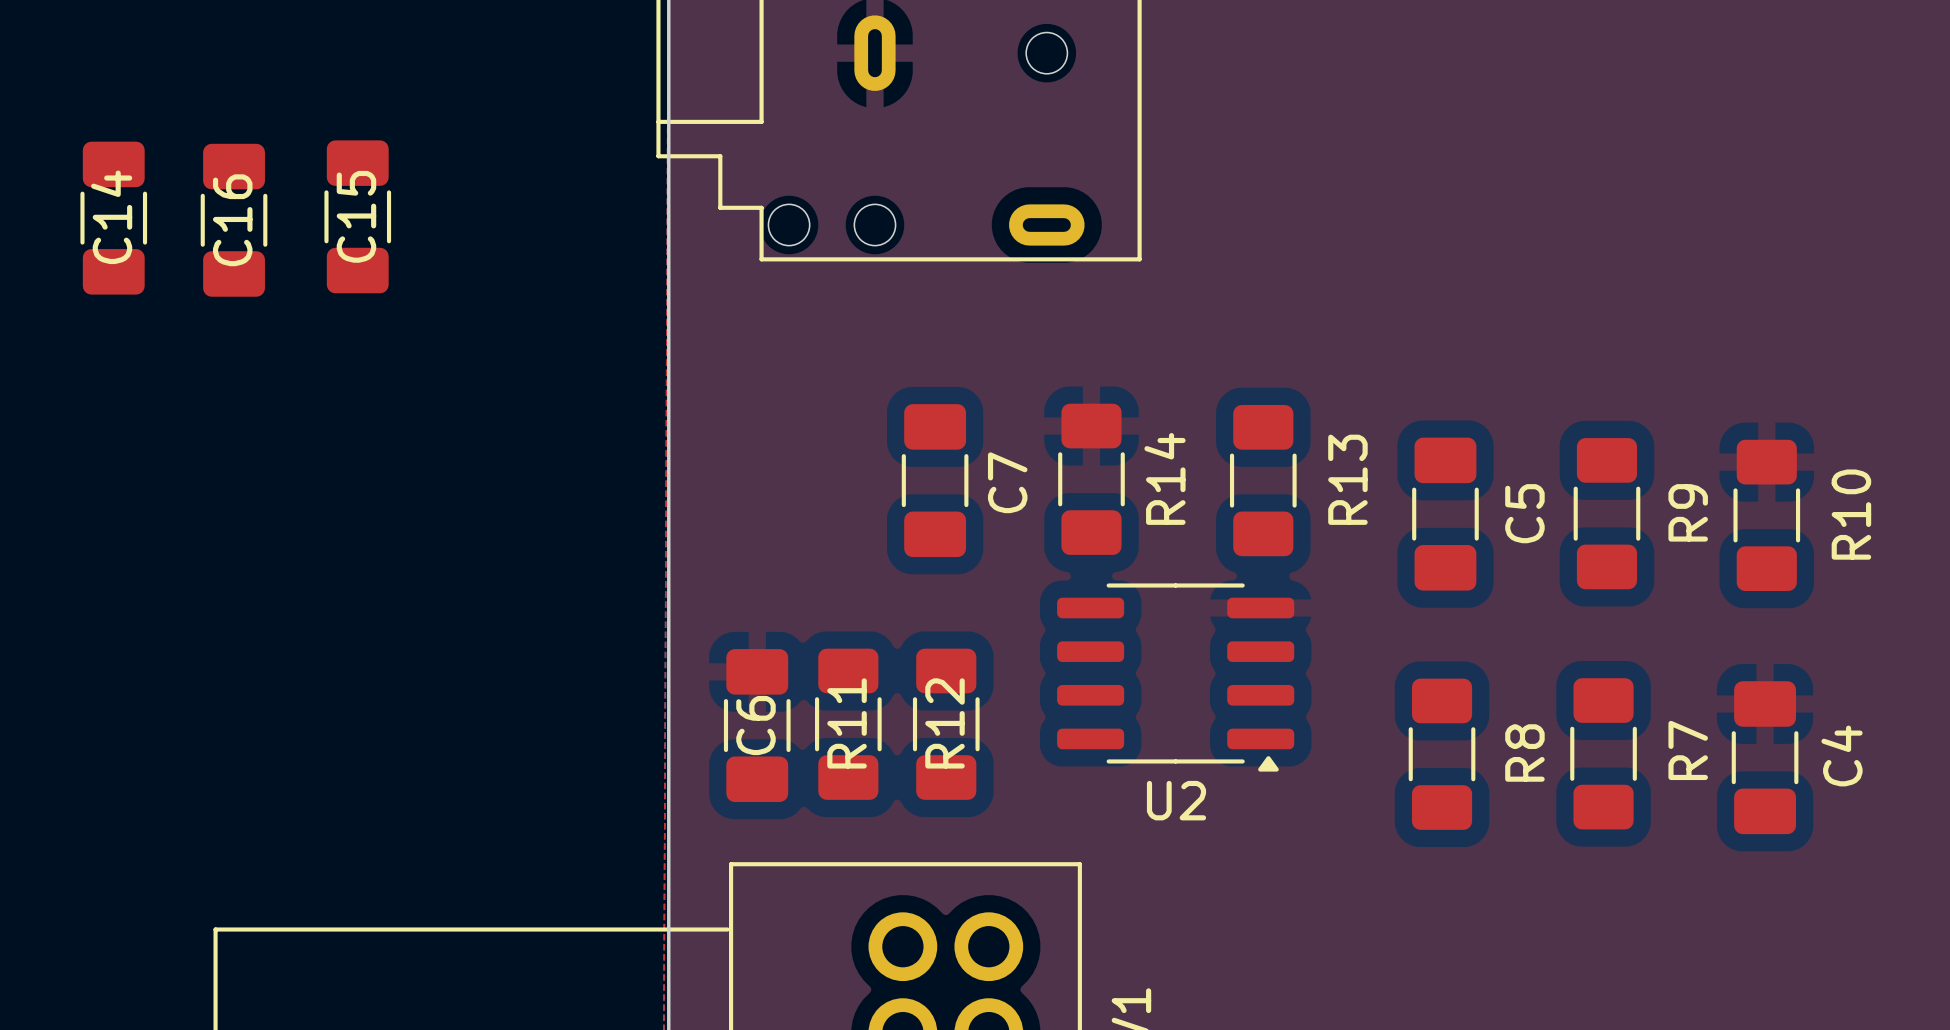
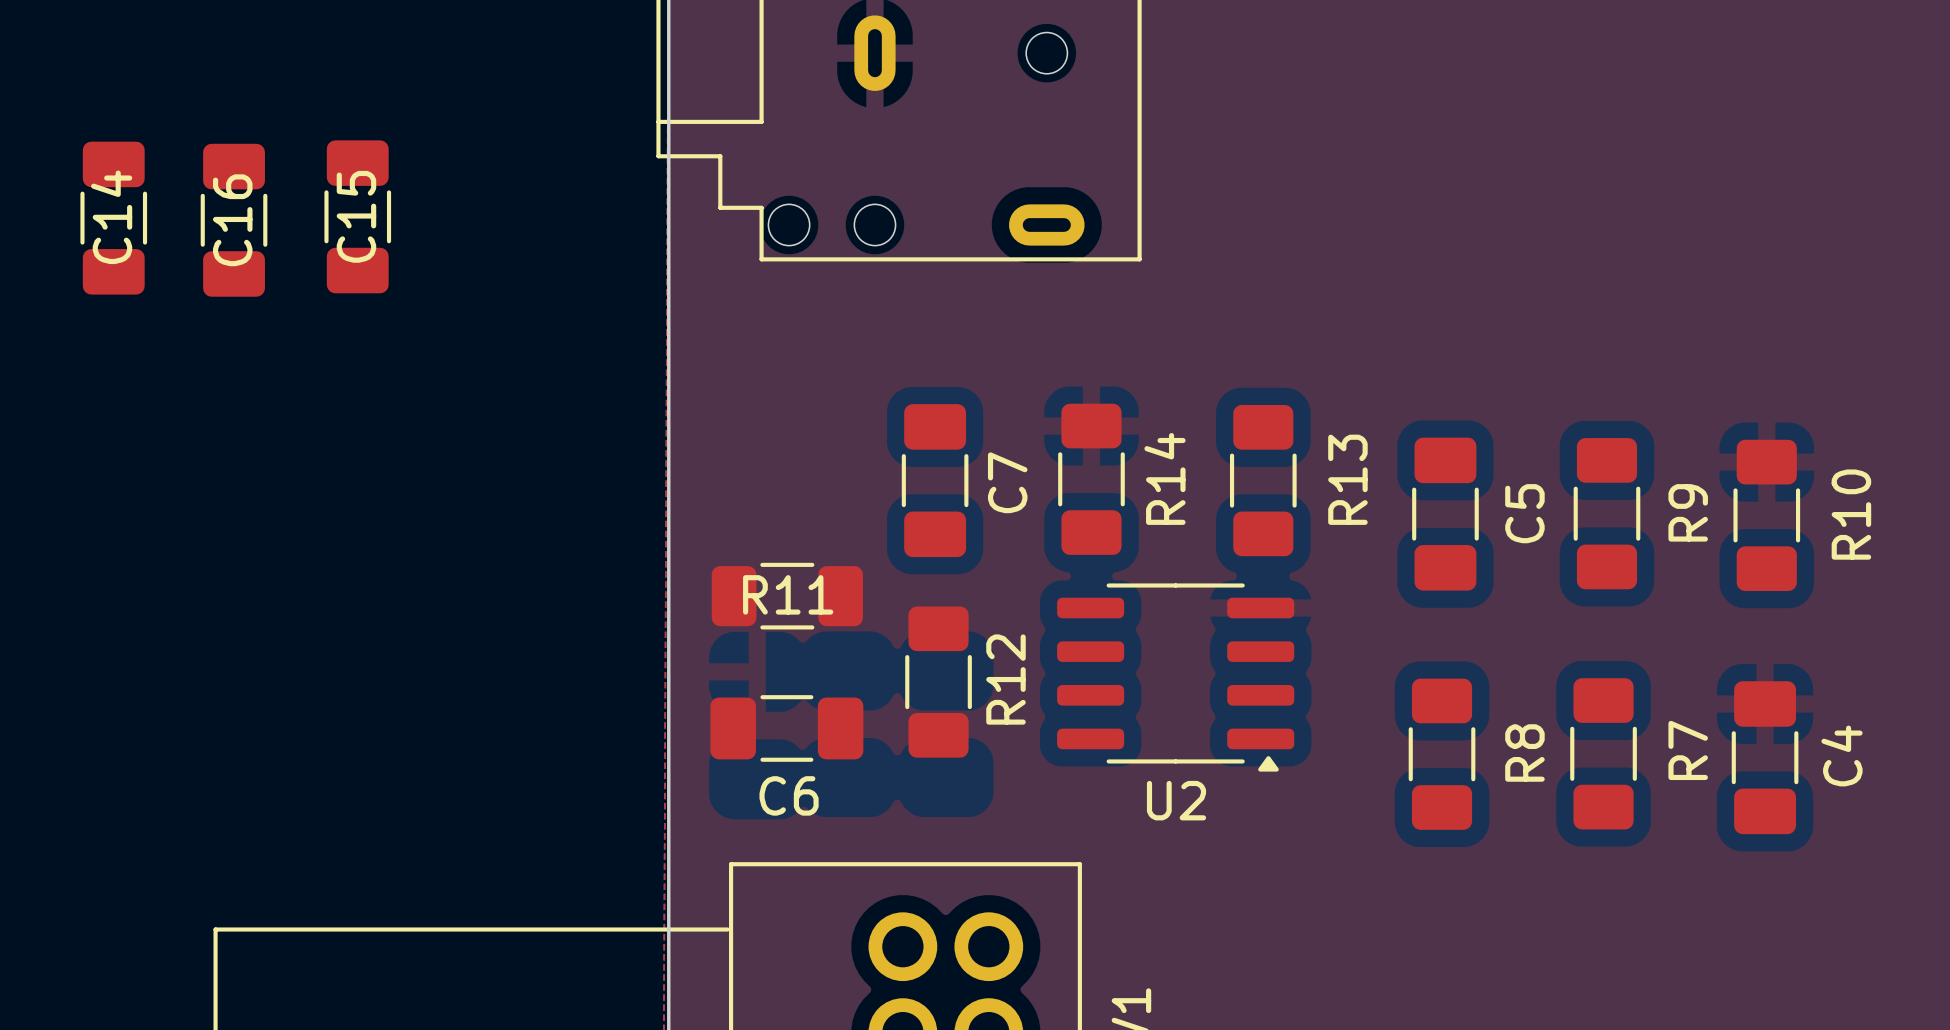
R12 name position: R12 (944, 723) -> R12 (1005, 679)
R11 rotation: 0° (848, 724) -> 90° clockwise (787, 596)
R11 position: (848, 724) -> (787, 596)
R12 position: (946, 724) -> (938, 682)
C6 name position: C6 (755, 725) -> C6 (789, 795)
C6 rotation: 0° (757, 725) -> 90° clockwise (786, 728)

